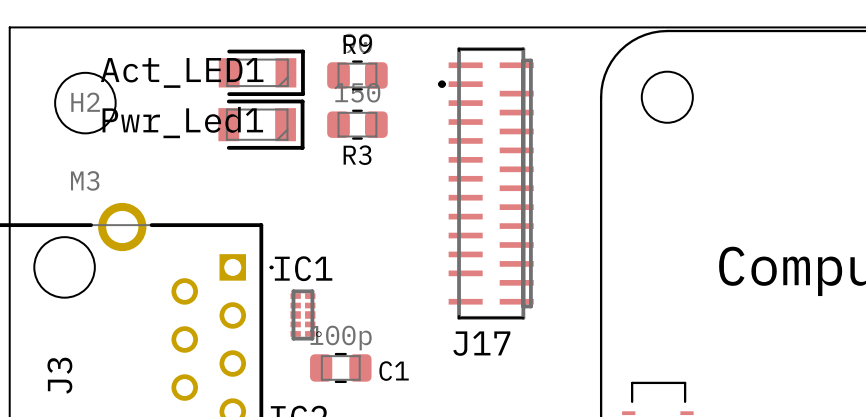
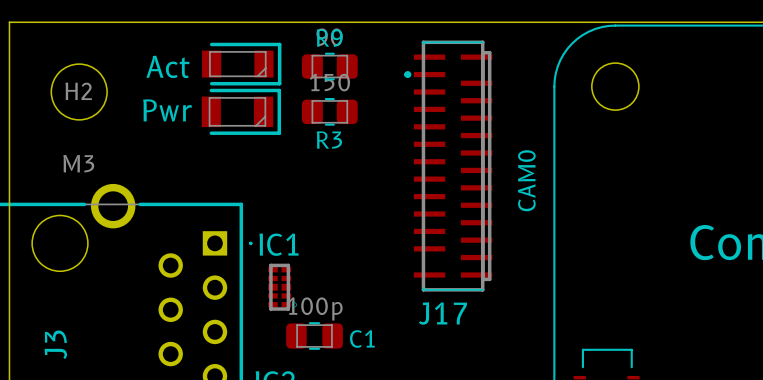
Act_LED1 name: Act_LED1 (182, 72) -> Act (168, 66)
Pwr_Led1 name: Pwr_Led1 (182, 122) -> Pwr (167, 110)
text: none -> CAM0 (526, 180)

